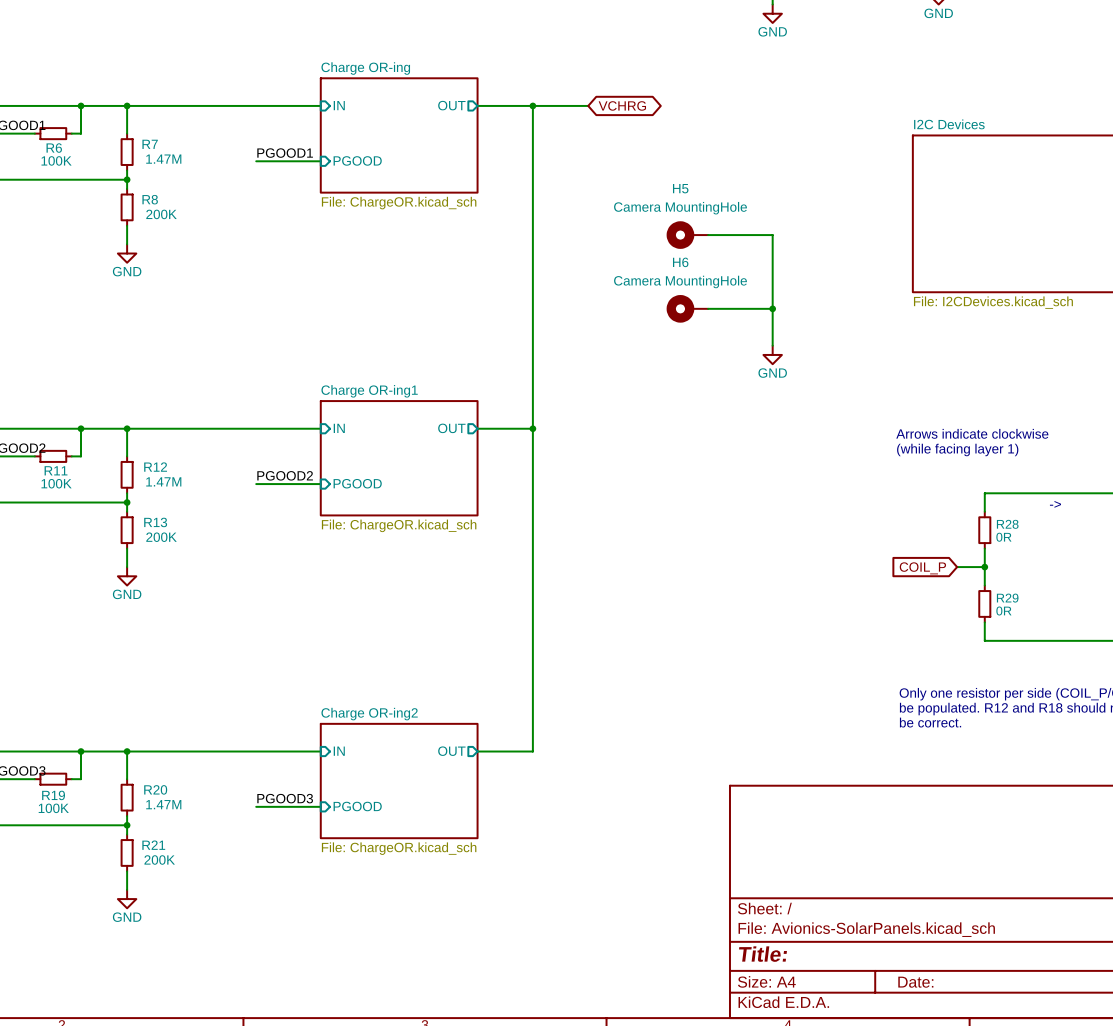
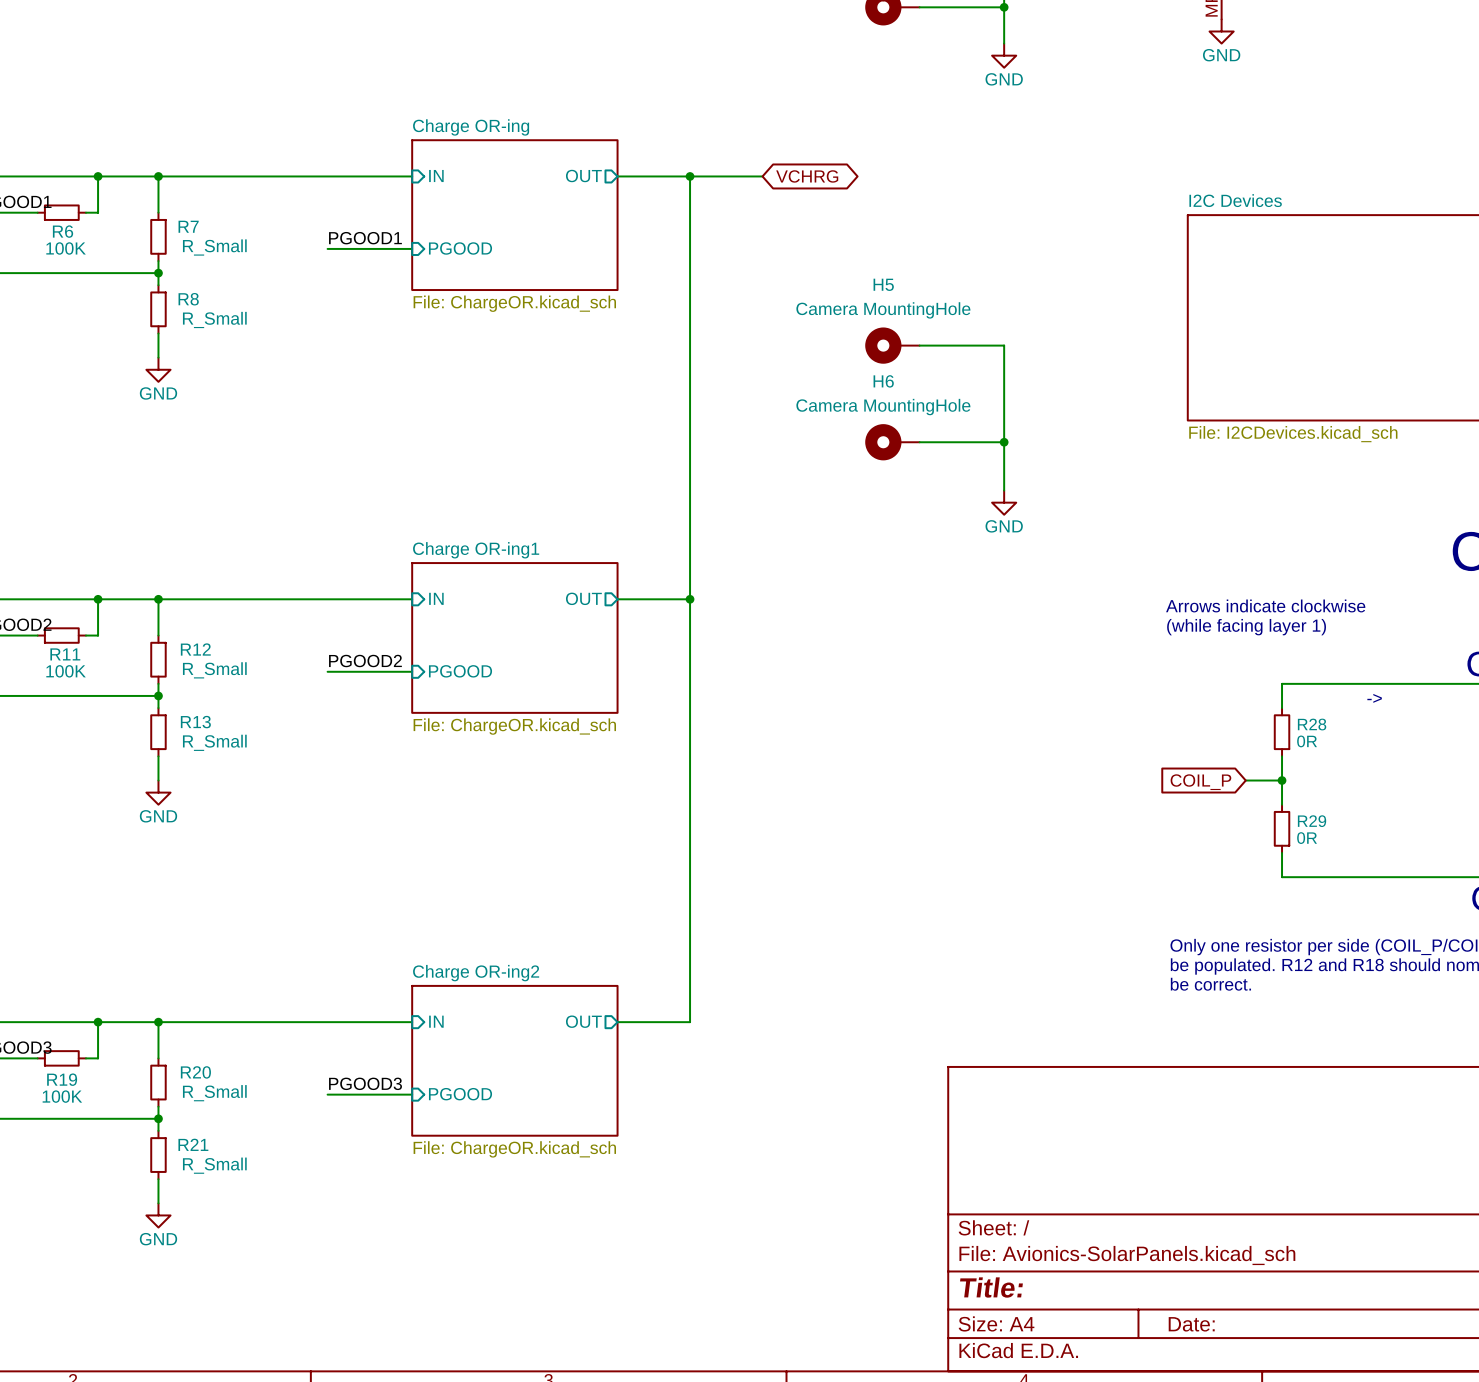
R7 value: 1.47M (163, 159) -> R_Small (214, 247)
R8 value: 200K (161, 214) -> R_Small (214, 319)
R12 value: 1.47M (163, 481) -> R_Small (214, 670)
R13 value: 200K (161, 537) -> R_Small (214, 742)
R20 value: 1.47M (163, 804) -> R_Small (214, 1093)
R21 value: 200K (159, 859) -> R_Small (214, 1165)

